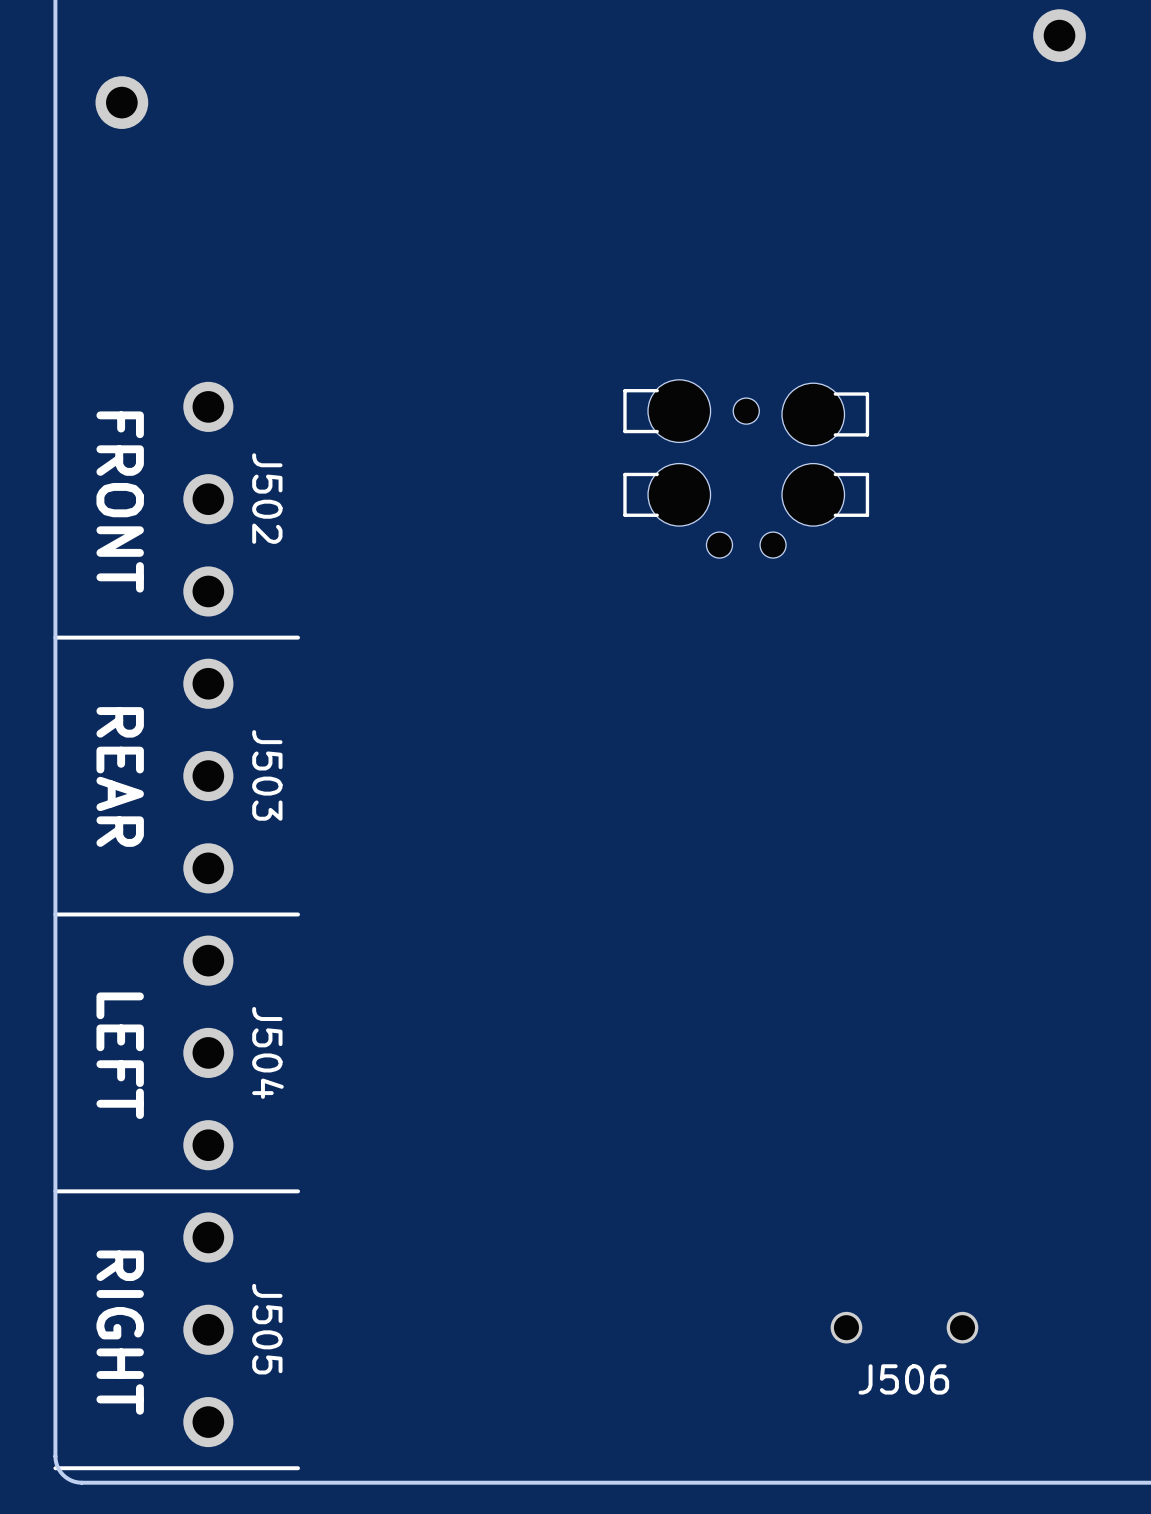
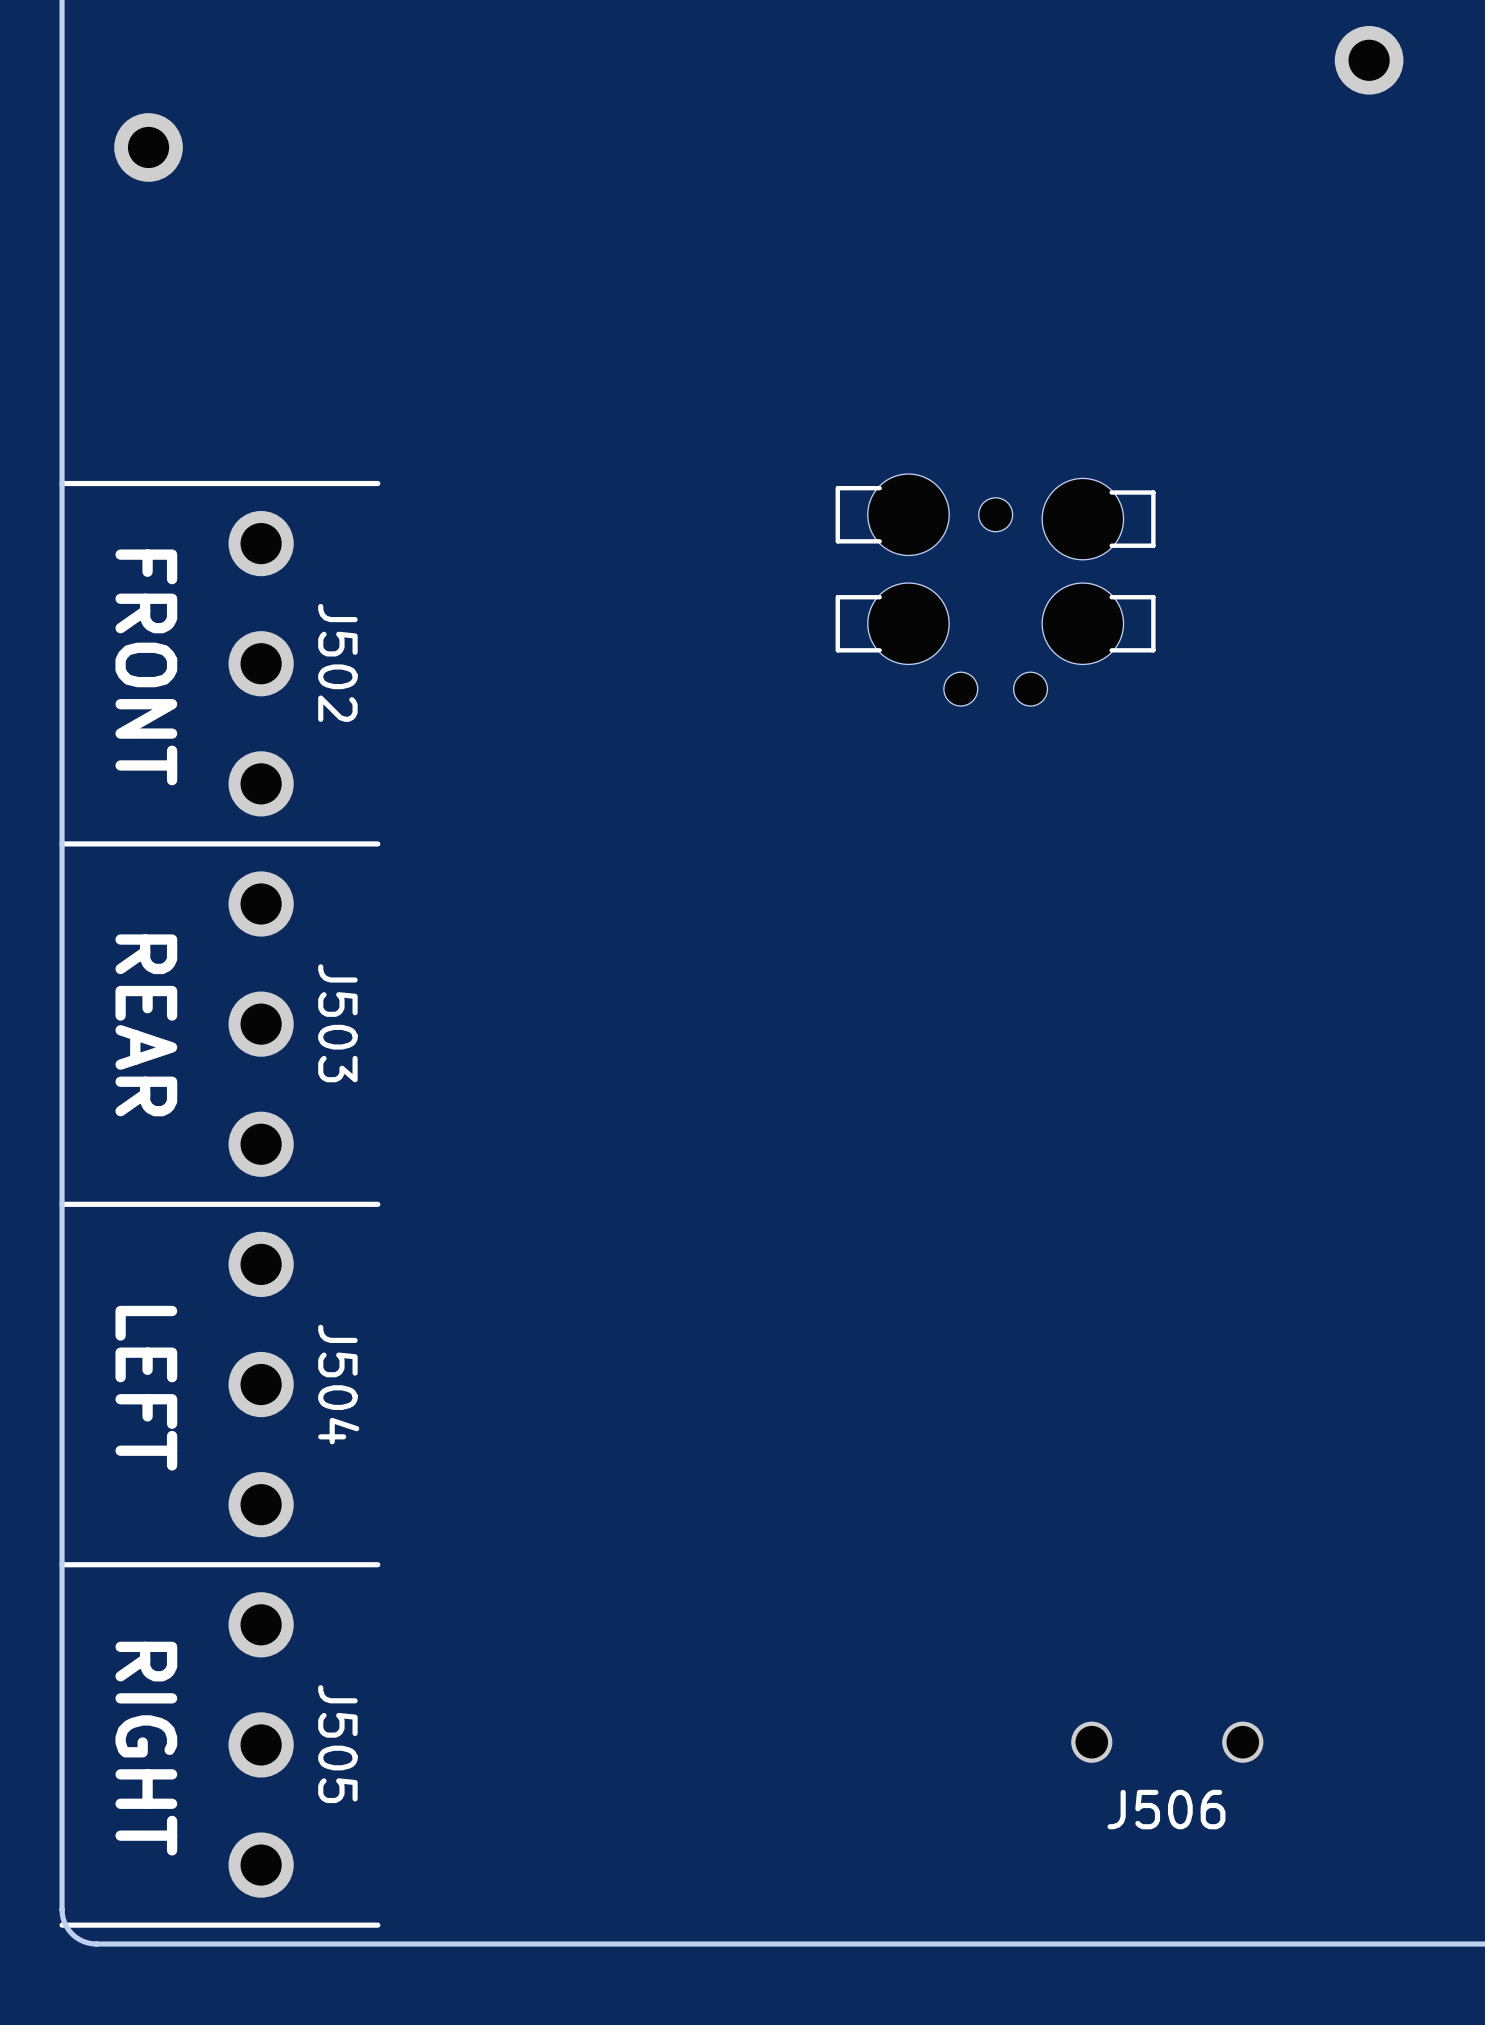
line: none -> (377, 483) (62, 483)
part position: (746, 468) -> (995, 590)

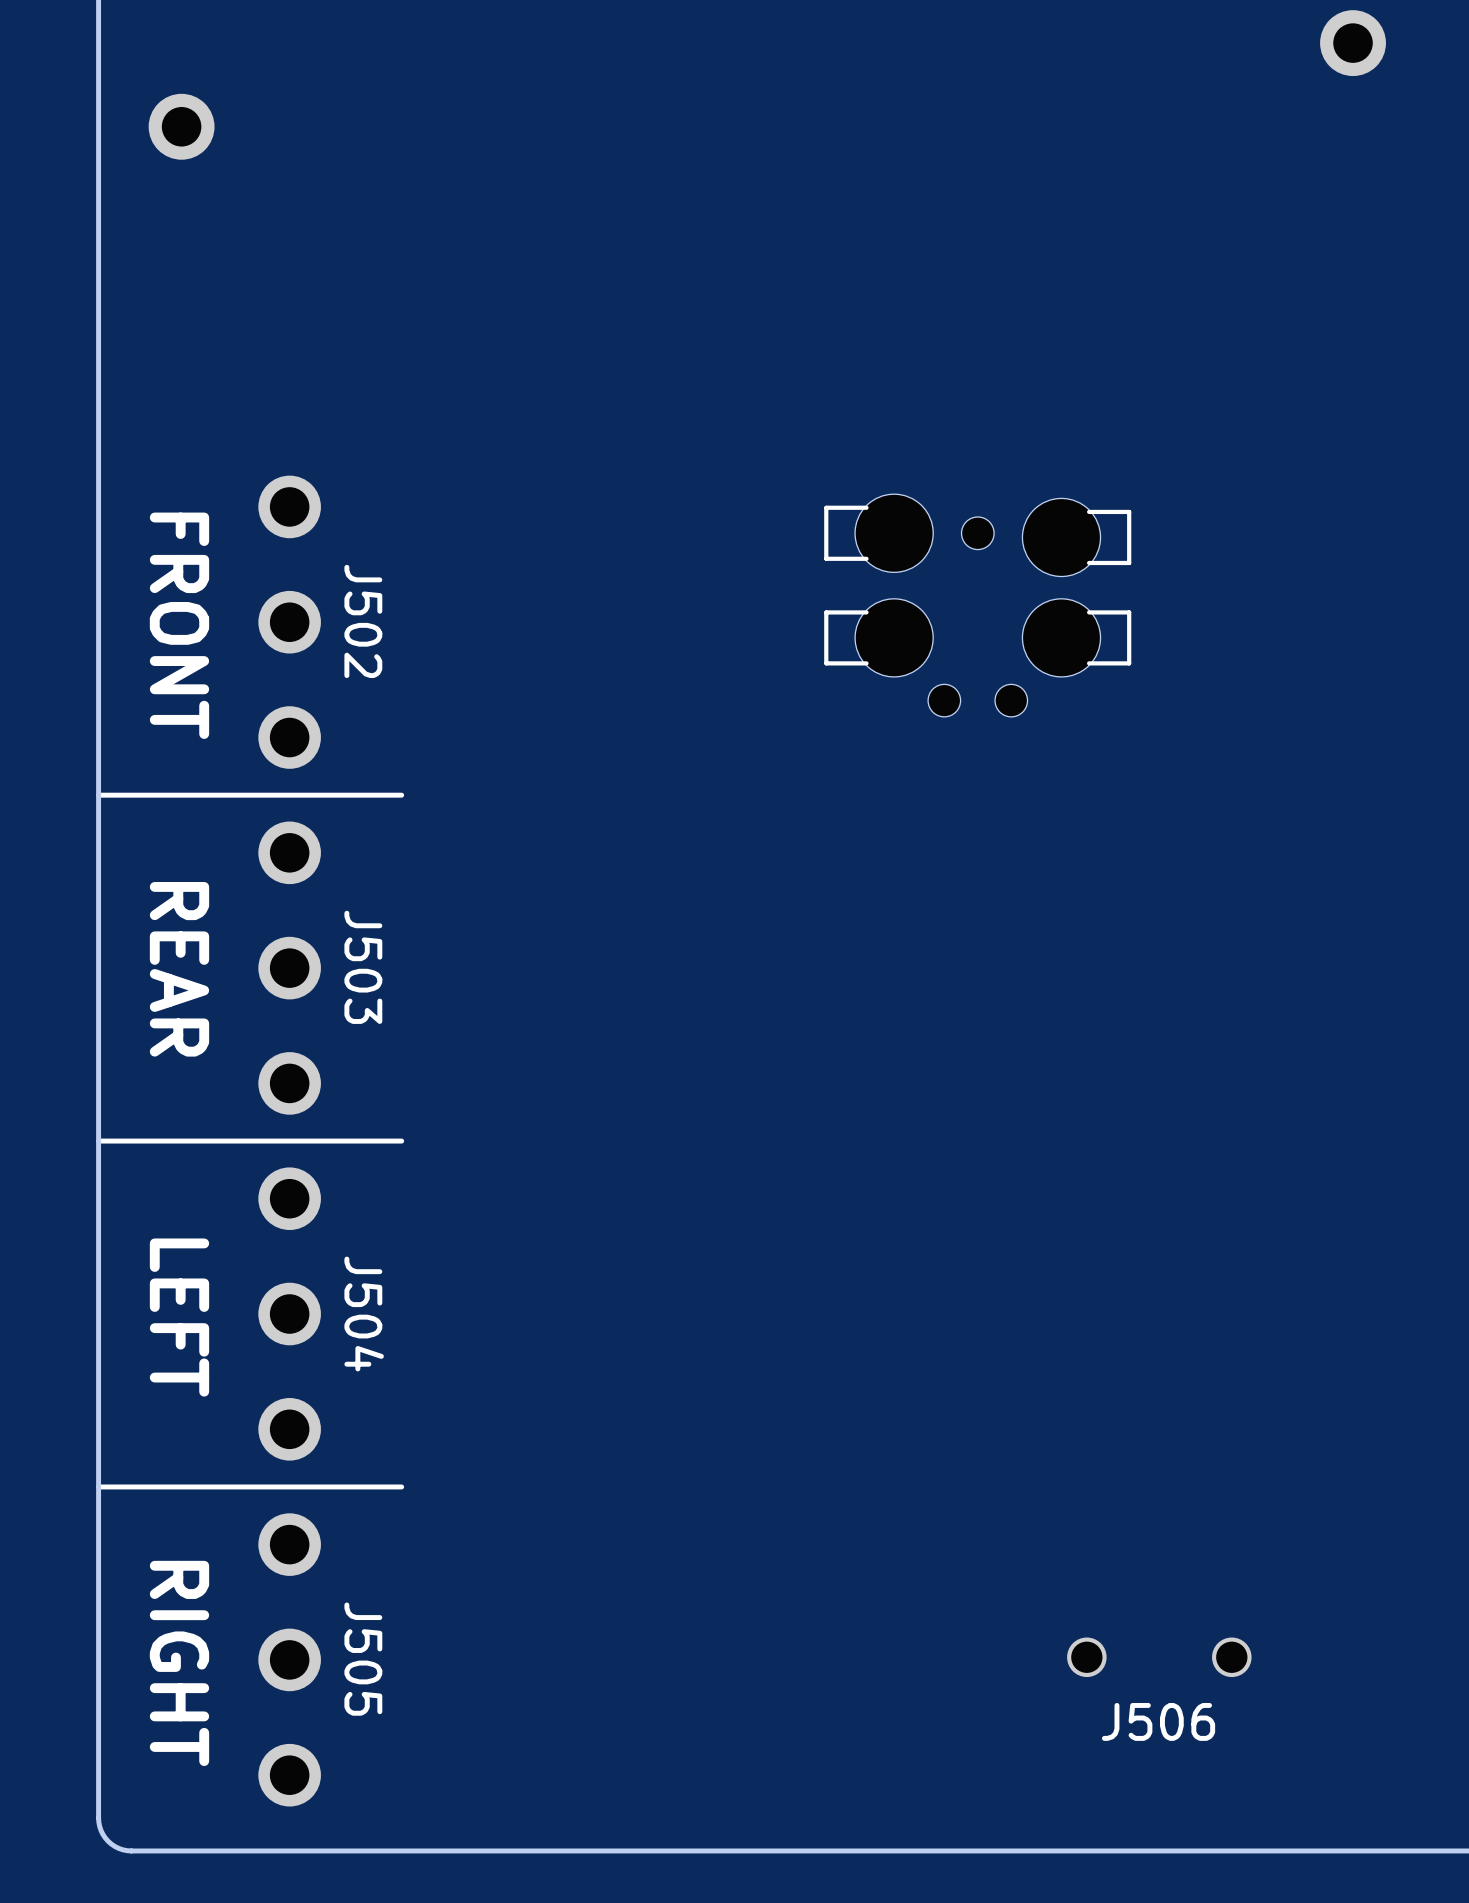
line: (377, 483) (62, 483) -> none
part position: (995, 590) -> (977, 605)
line: (377, 1925) (62, 1925) -> none

